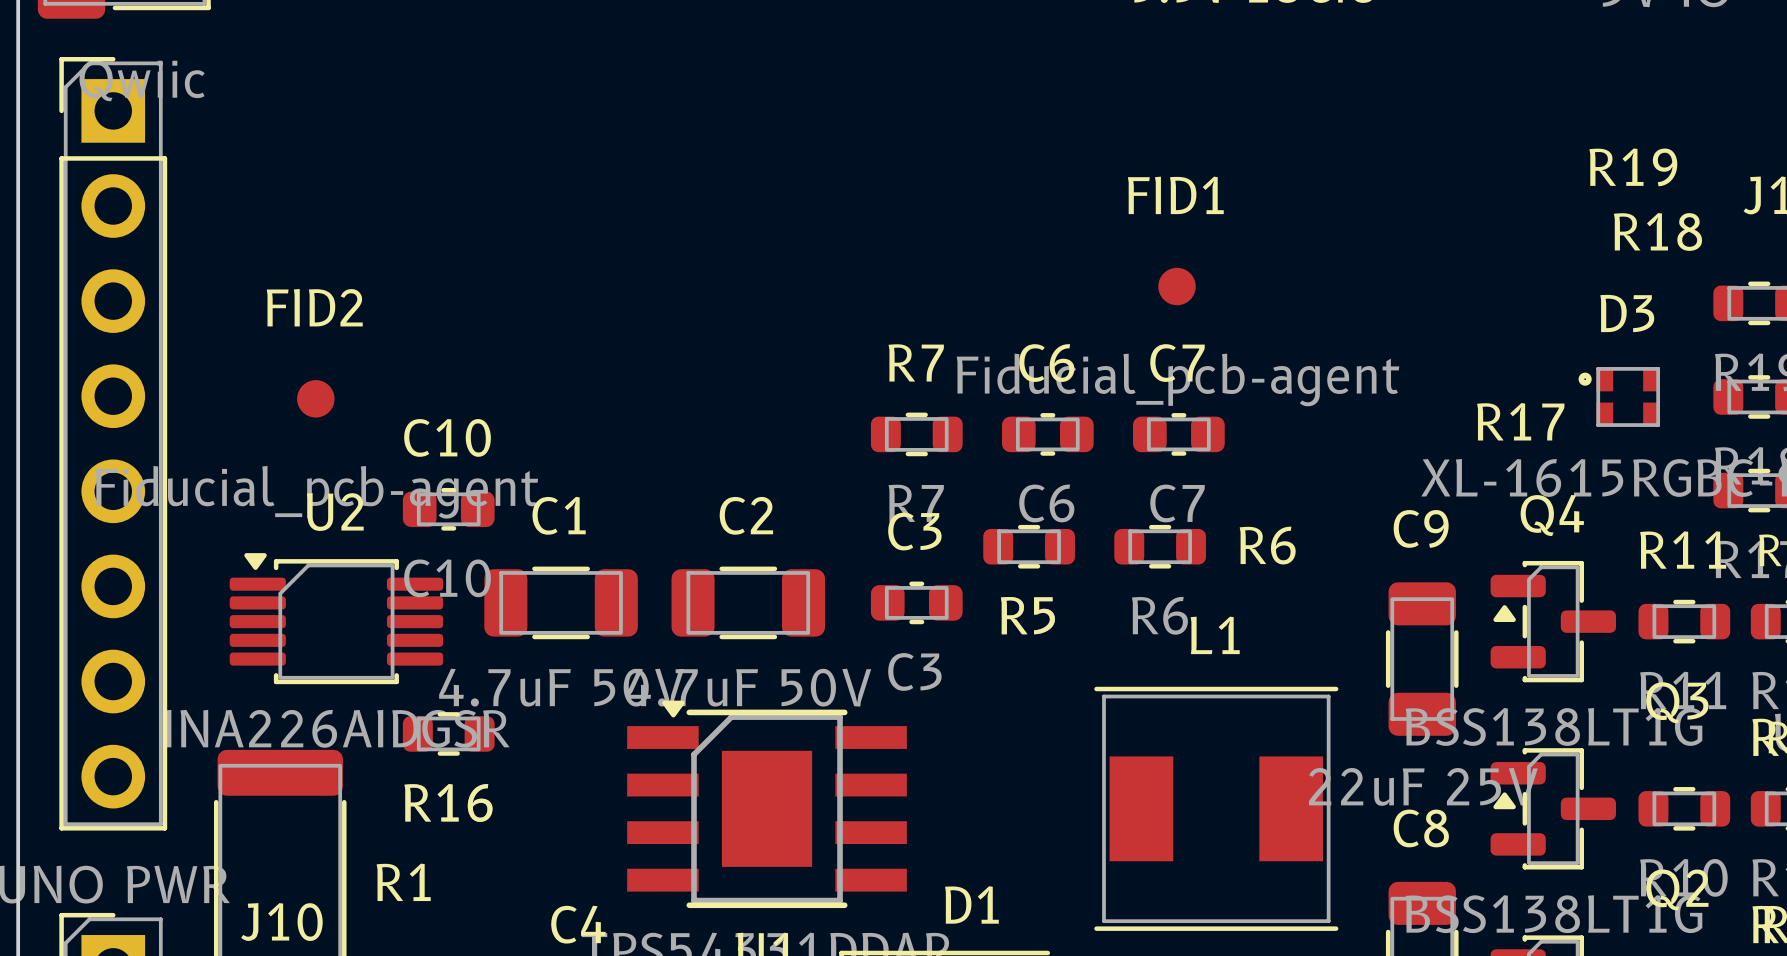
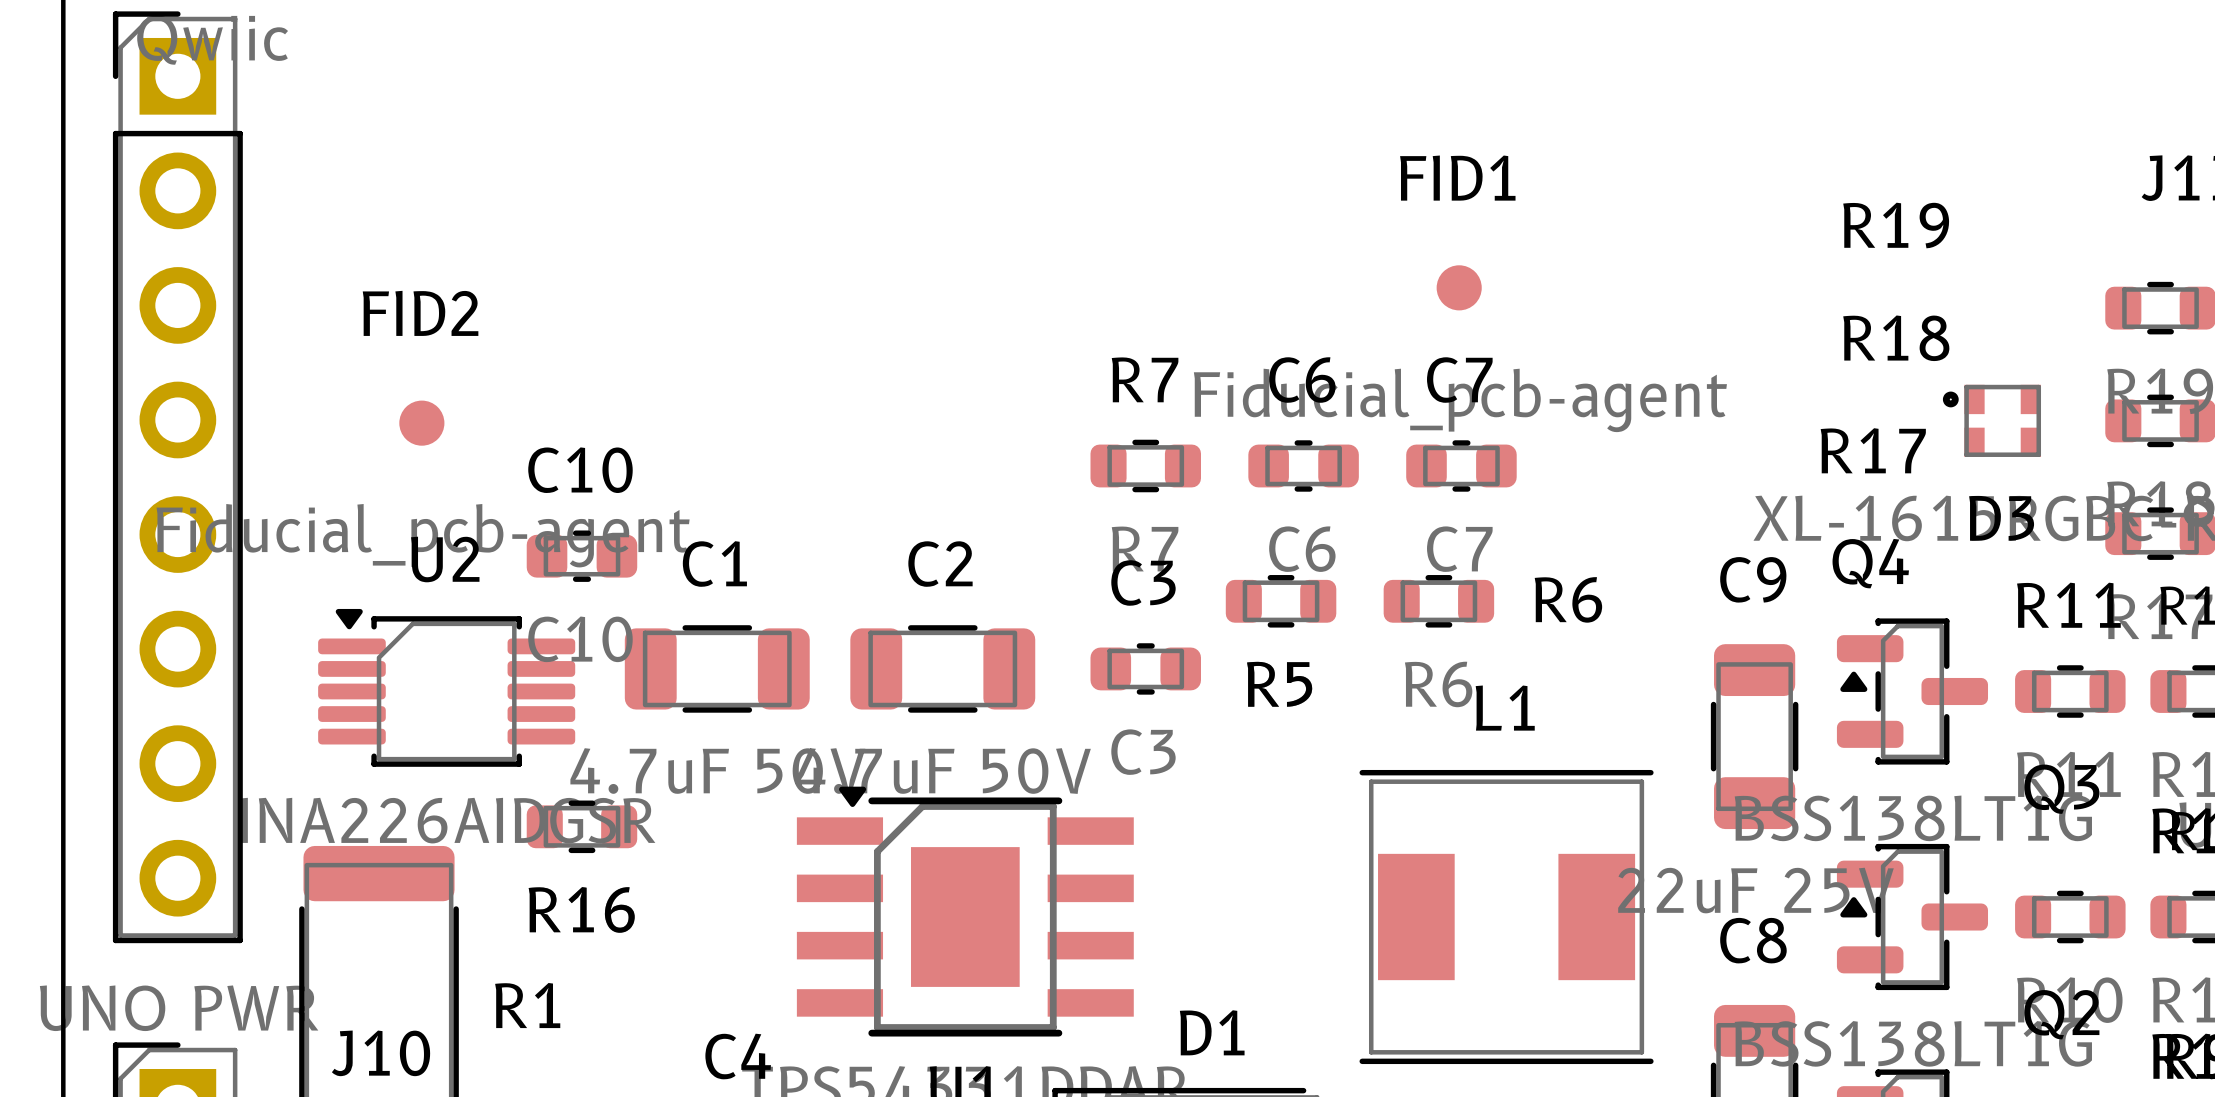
R19 name position: R19 (1633, 167) -> R19 (1896, 225)
R18 name position: R18 (1657, 231) -> R18 (1896, 338)
D3 name position: D3 (1627, 313) -> D3 (2001, 518)
Q4 name position: Q4 (1552, 515) -> Q4 (1870, 563)

